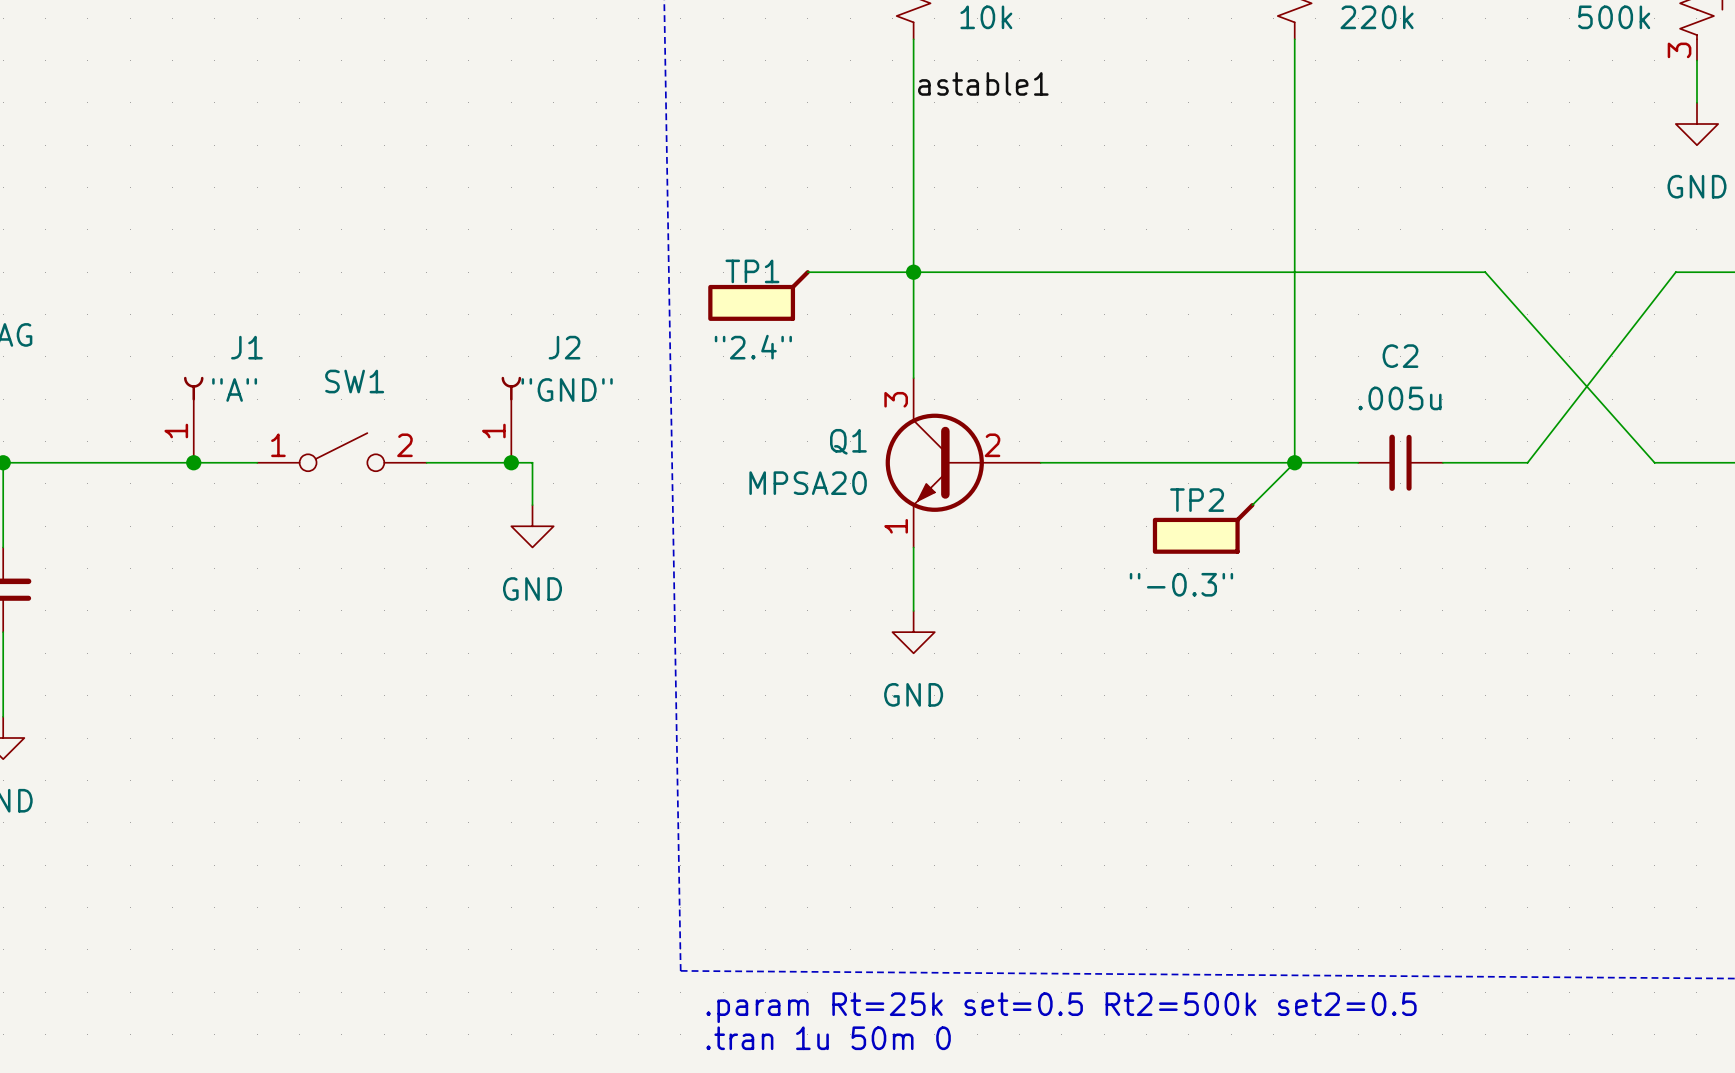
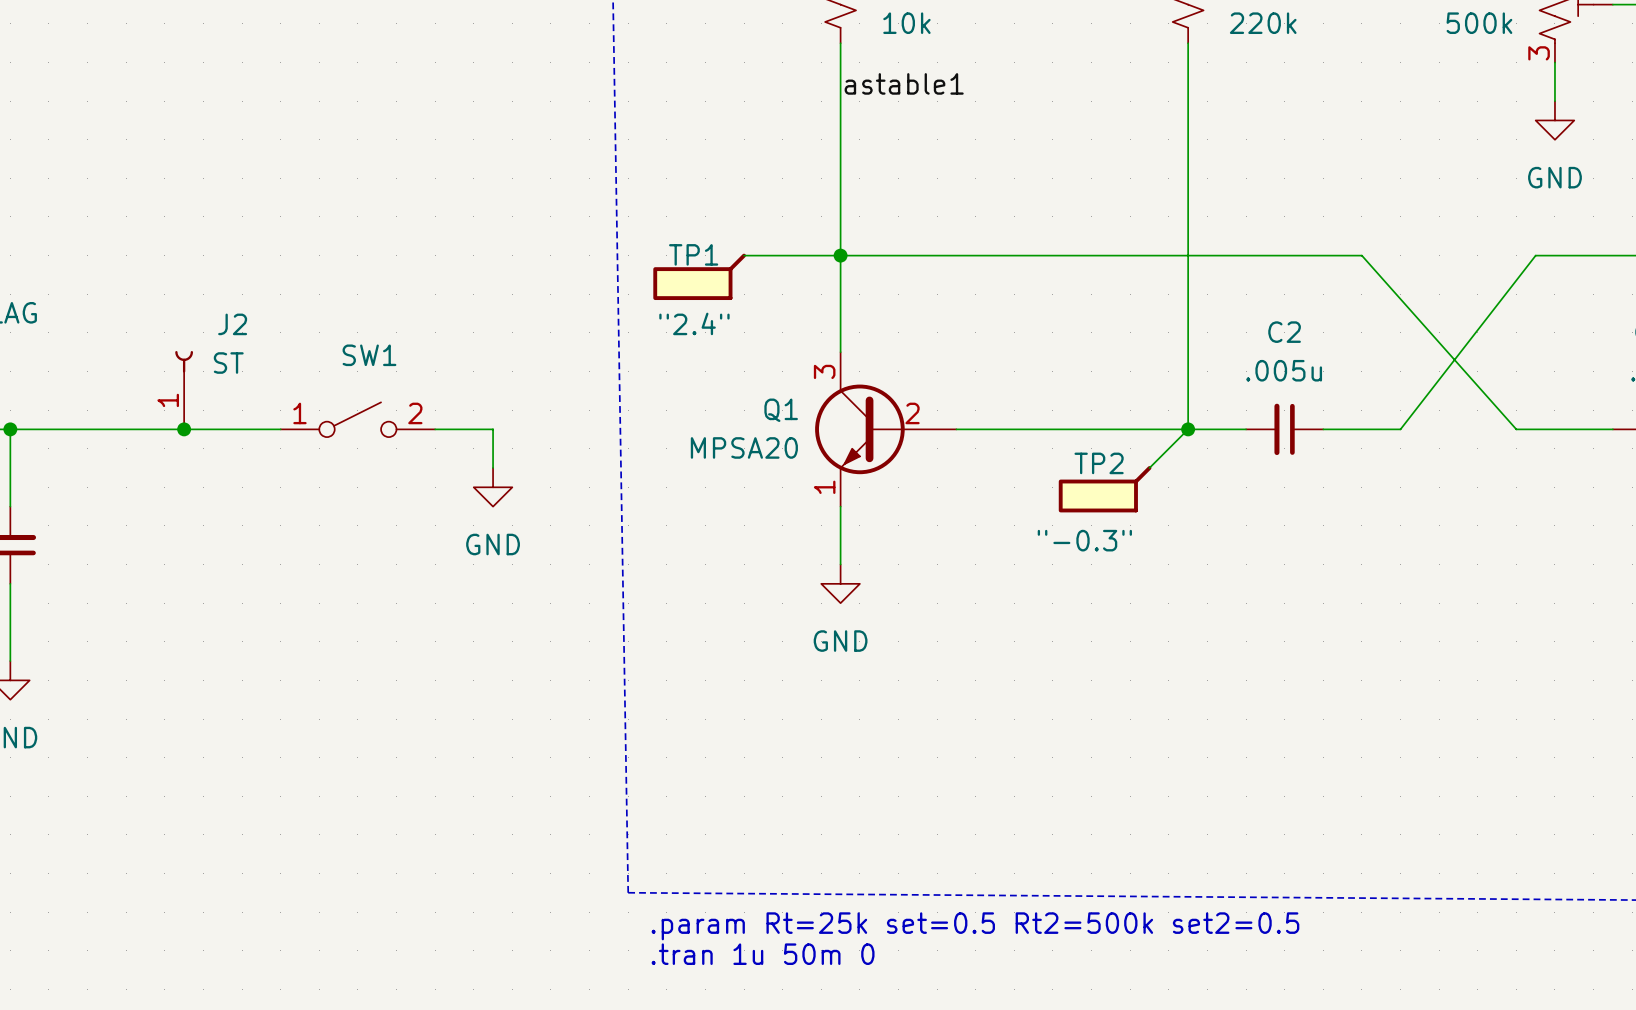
J1 name: J1 (246, 347) -> J2 (232, 324)
J1 value: "A" (234, 389) -> ST (228, 363)
J2: "GND" (511, 419) -> none
SW1 position: (341, 452) -> (357, 419)
junction: (511, 462) -> none

